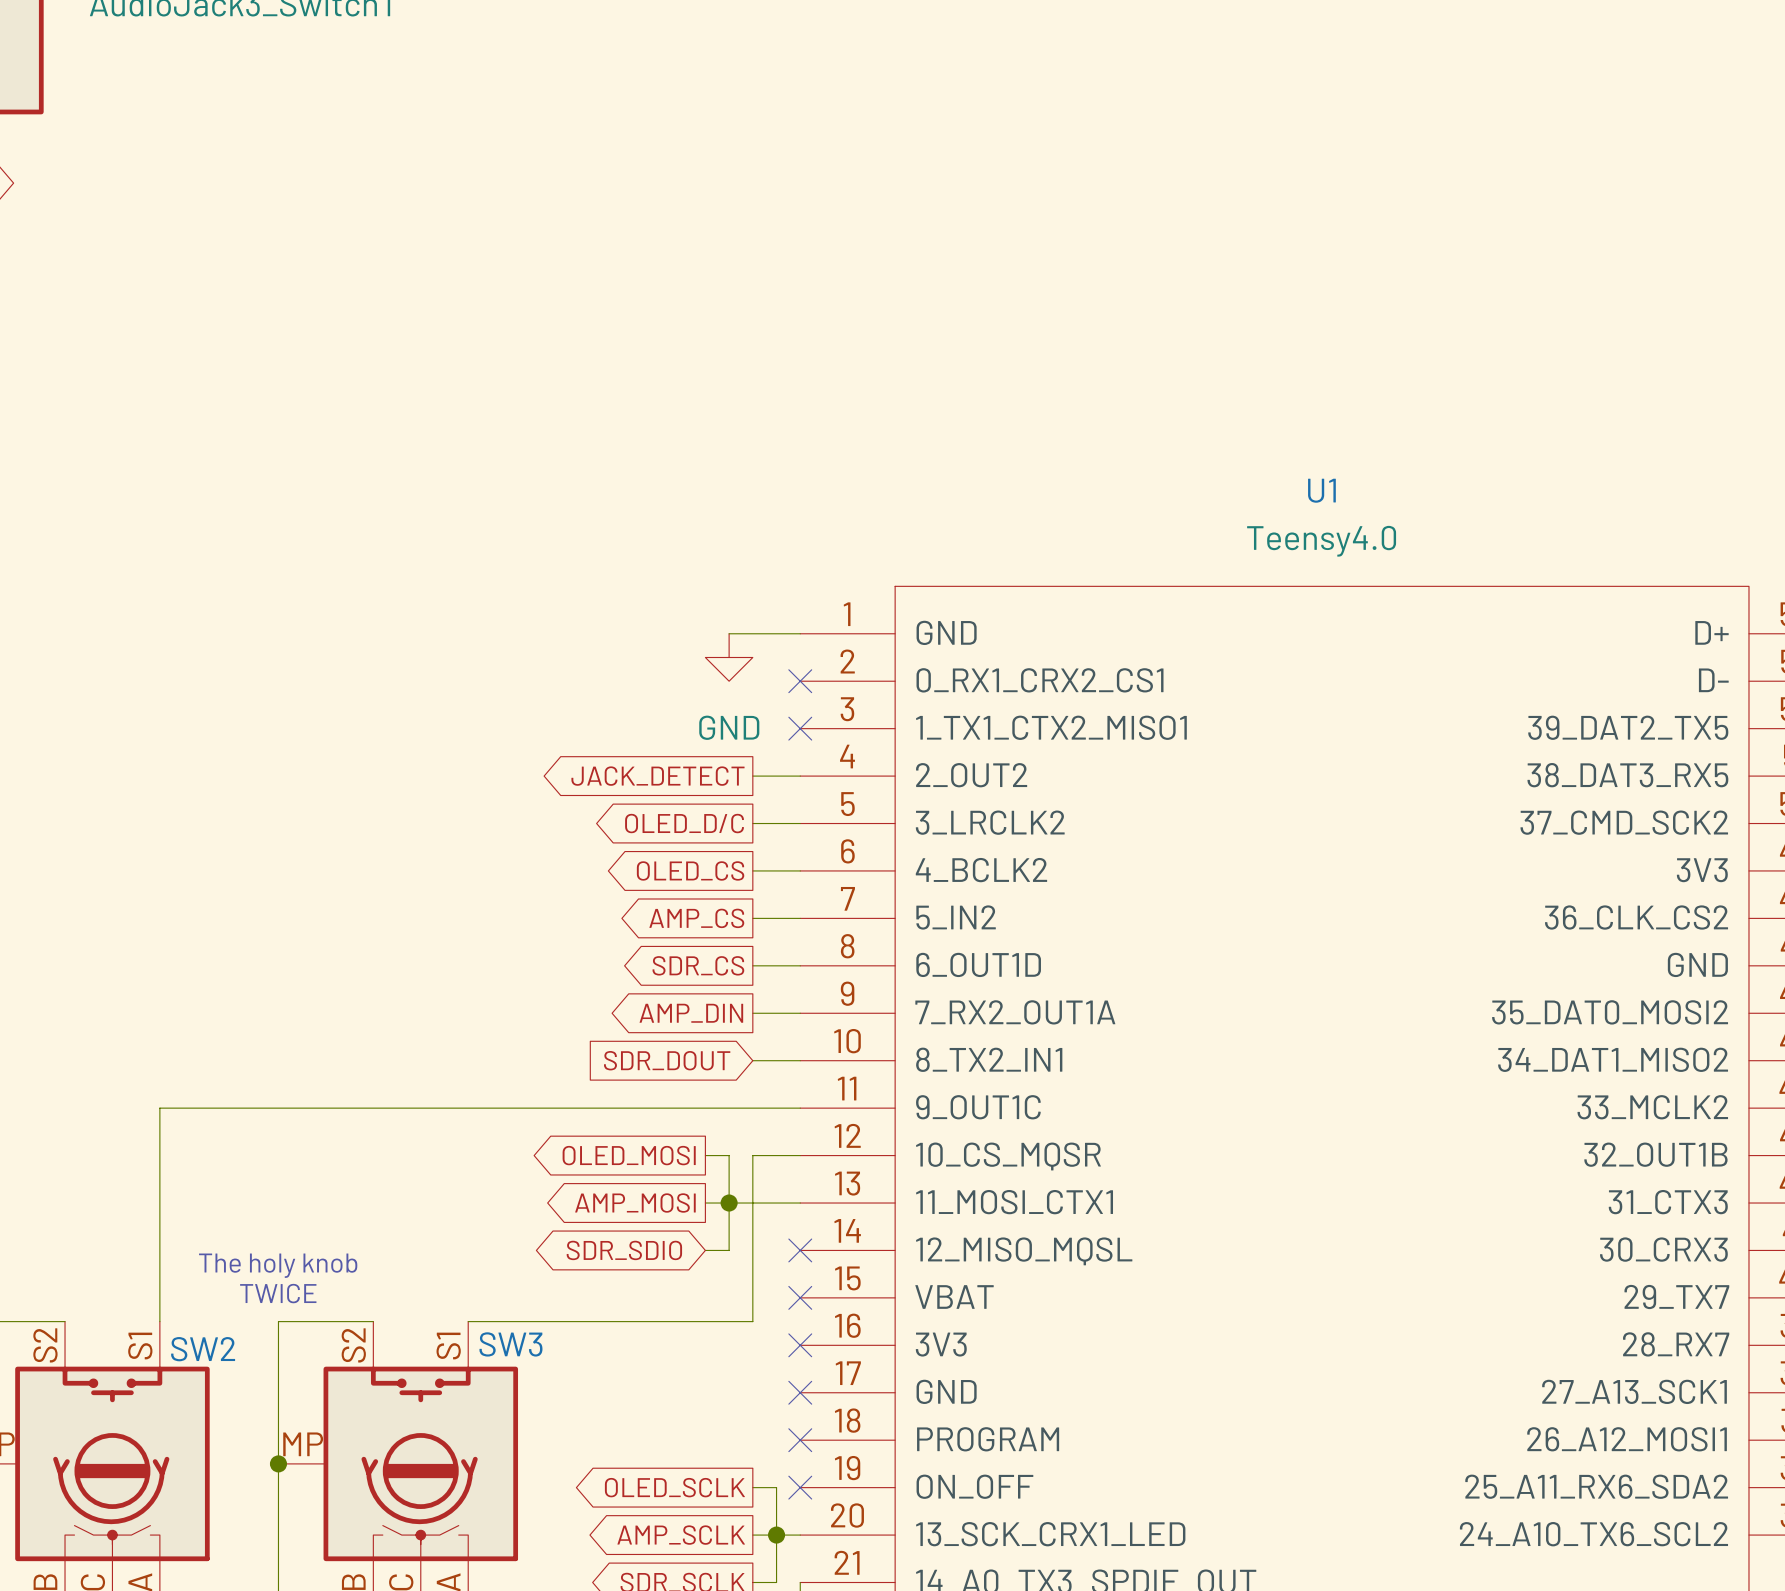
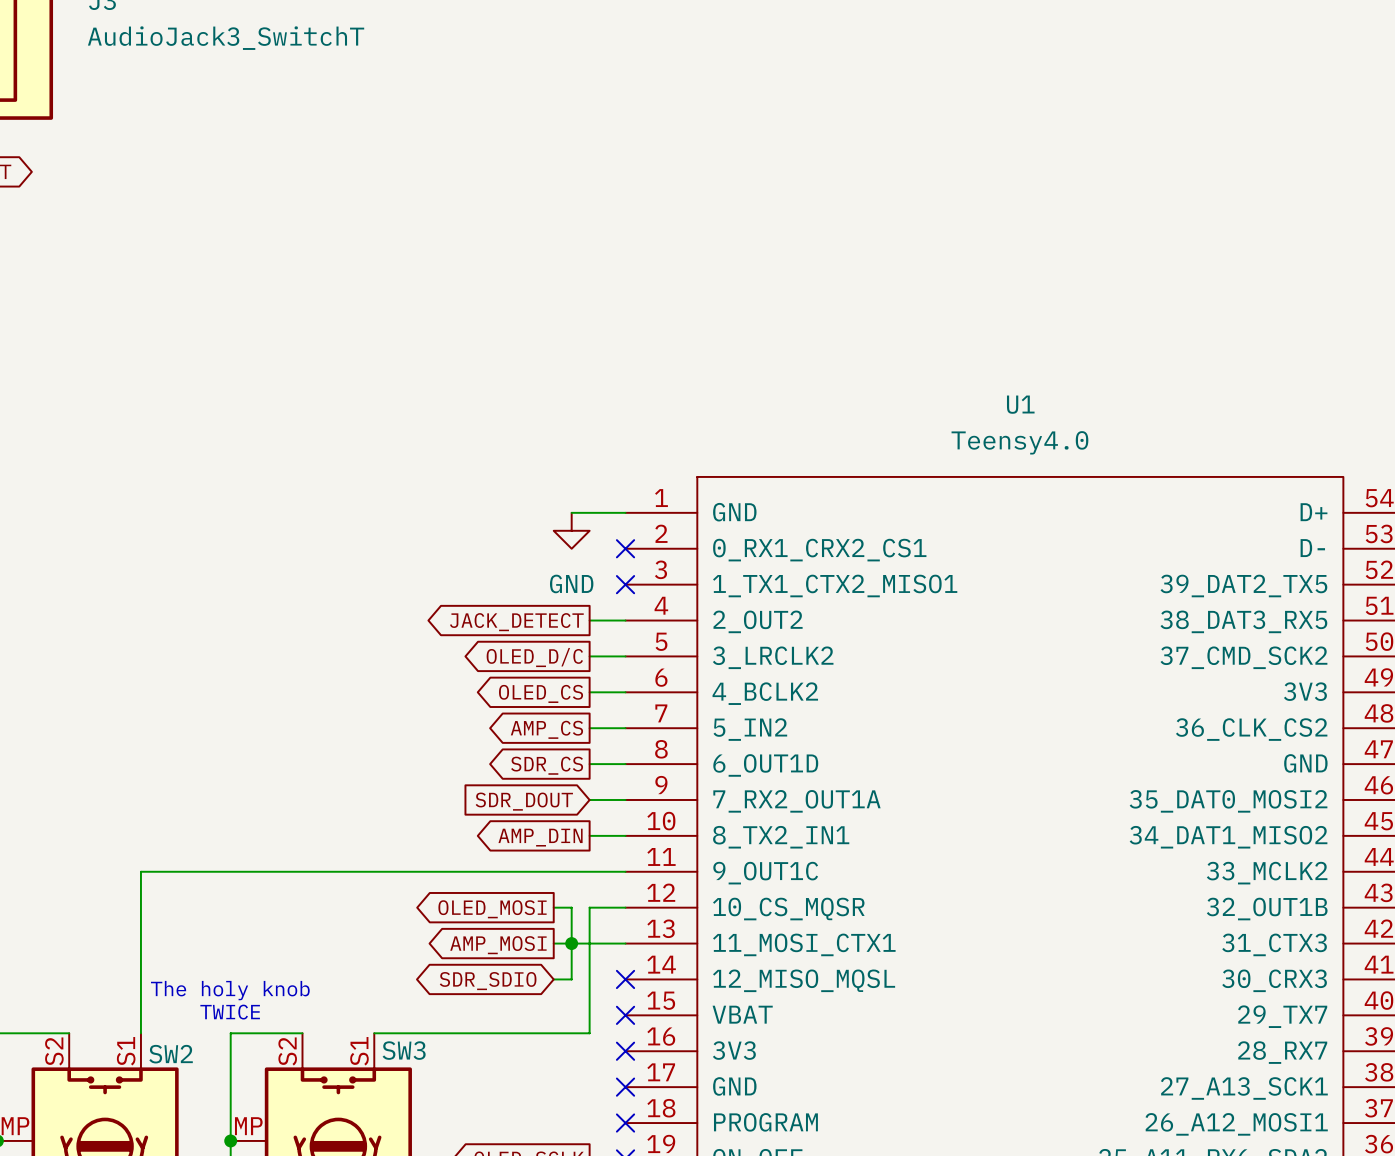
global label shape: output (691, 1013) -> input (524, 801)
global label: AMP_DIN (691, 1013) -> SDR_DOUT (524, 801)
global label shape: input (667, 1060) -> output (540, 837)
global label: SDR_DOUT (667, 1060) -> AMP_DIN (540, 837)

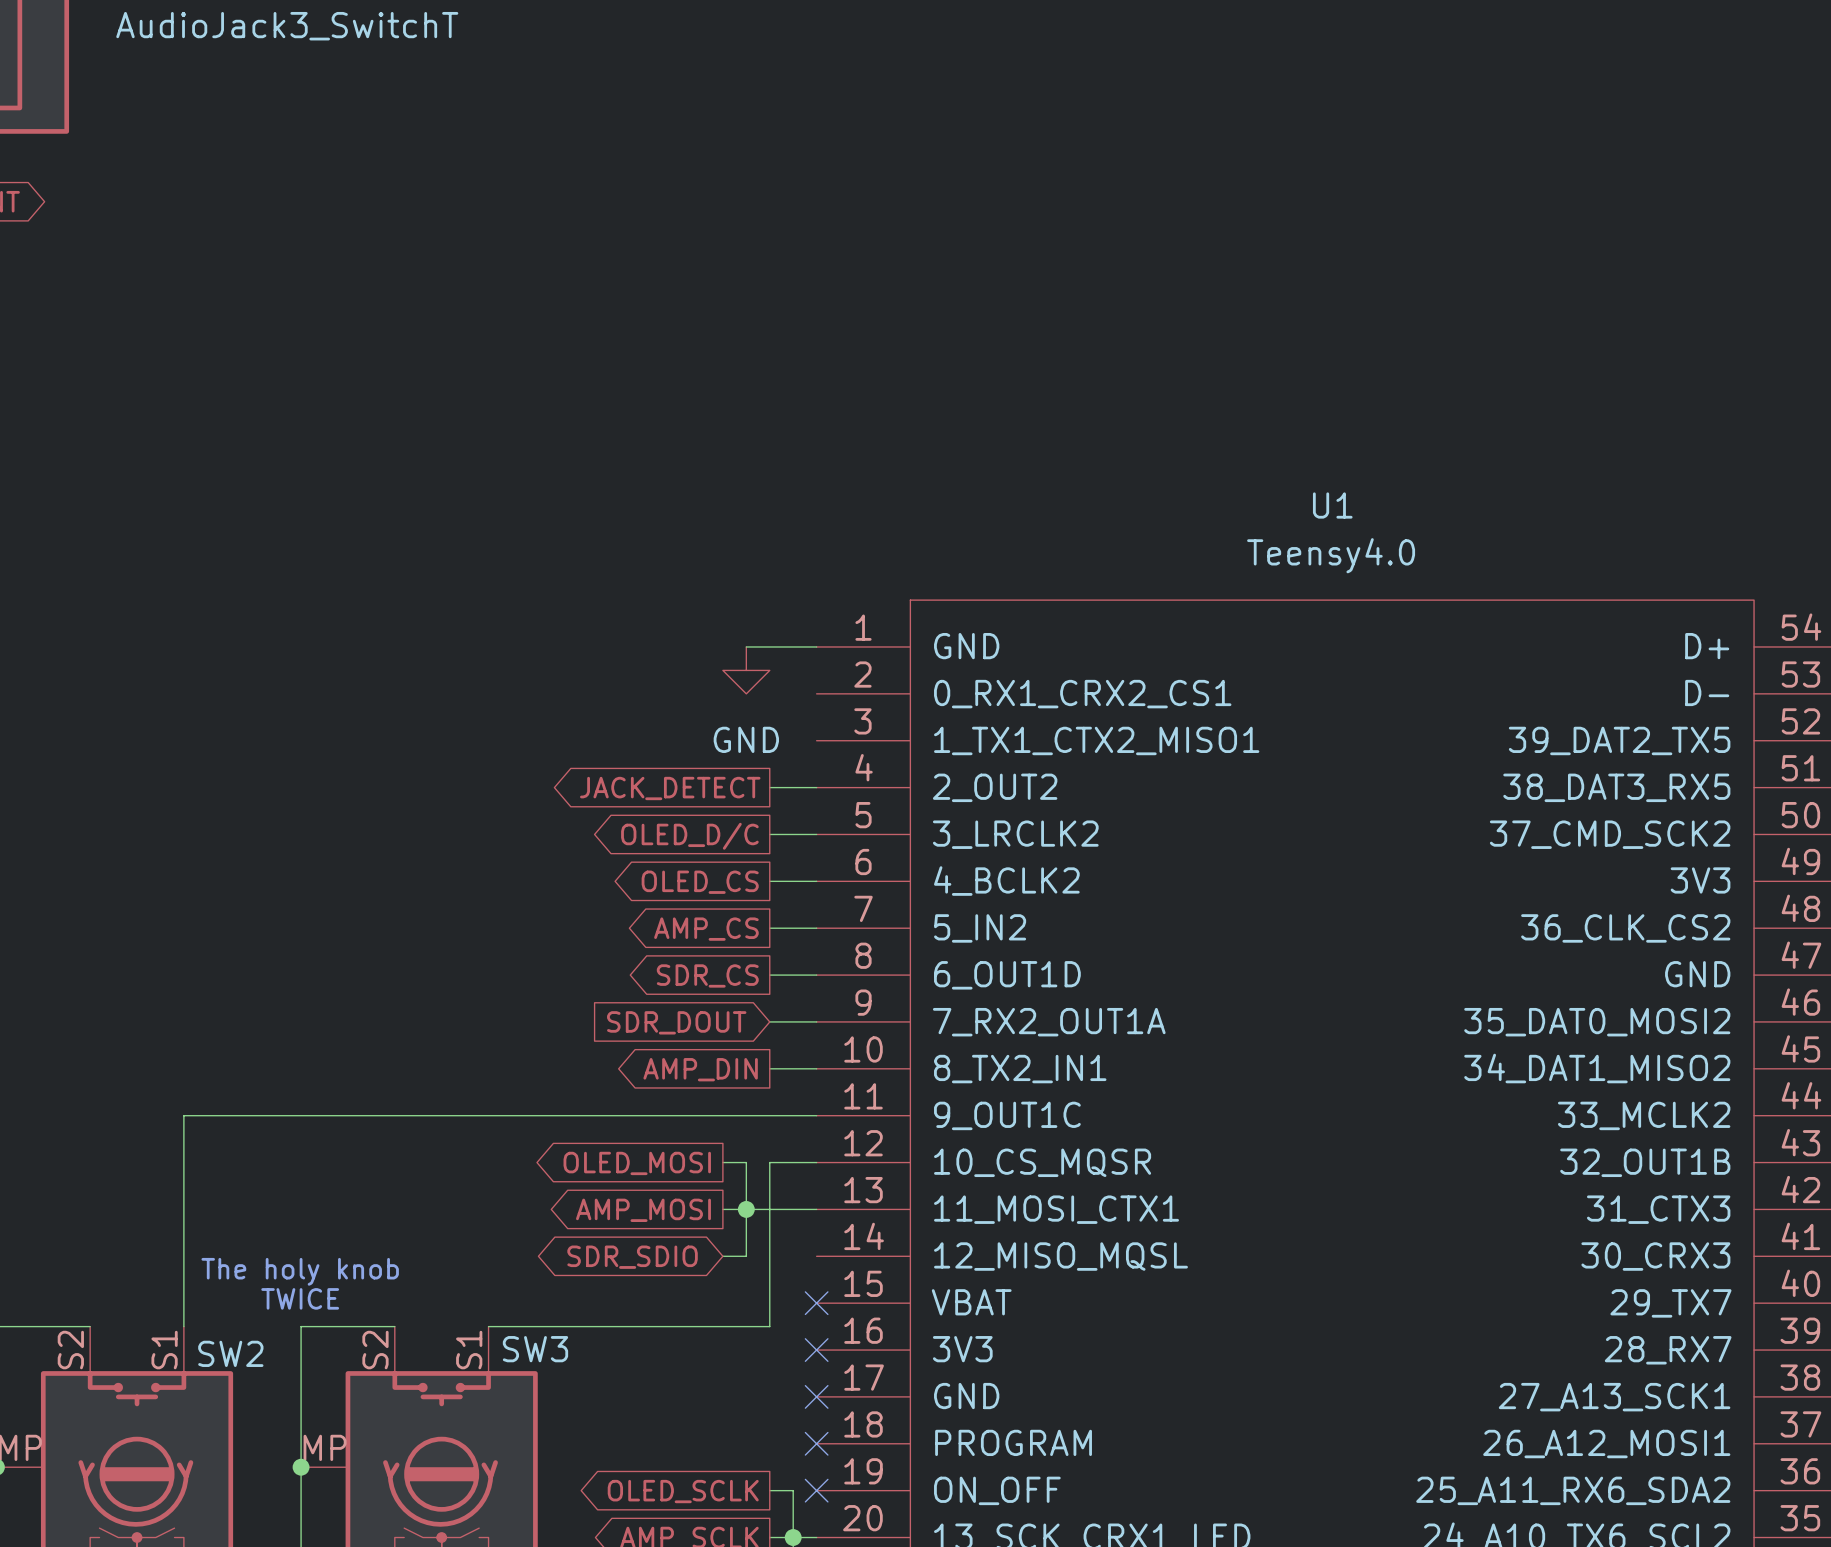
no-connect mark: (625, 548) -> none
no-connect mark: (625, 584) -> none
no-connect mark: (625, 979) -> none

